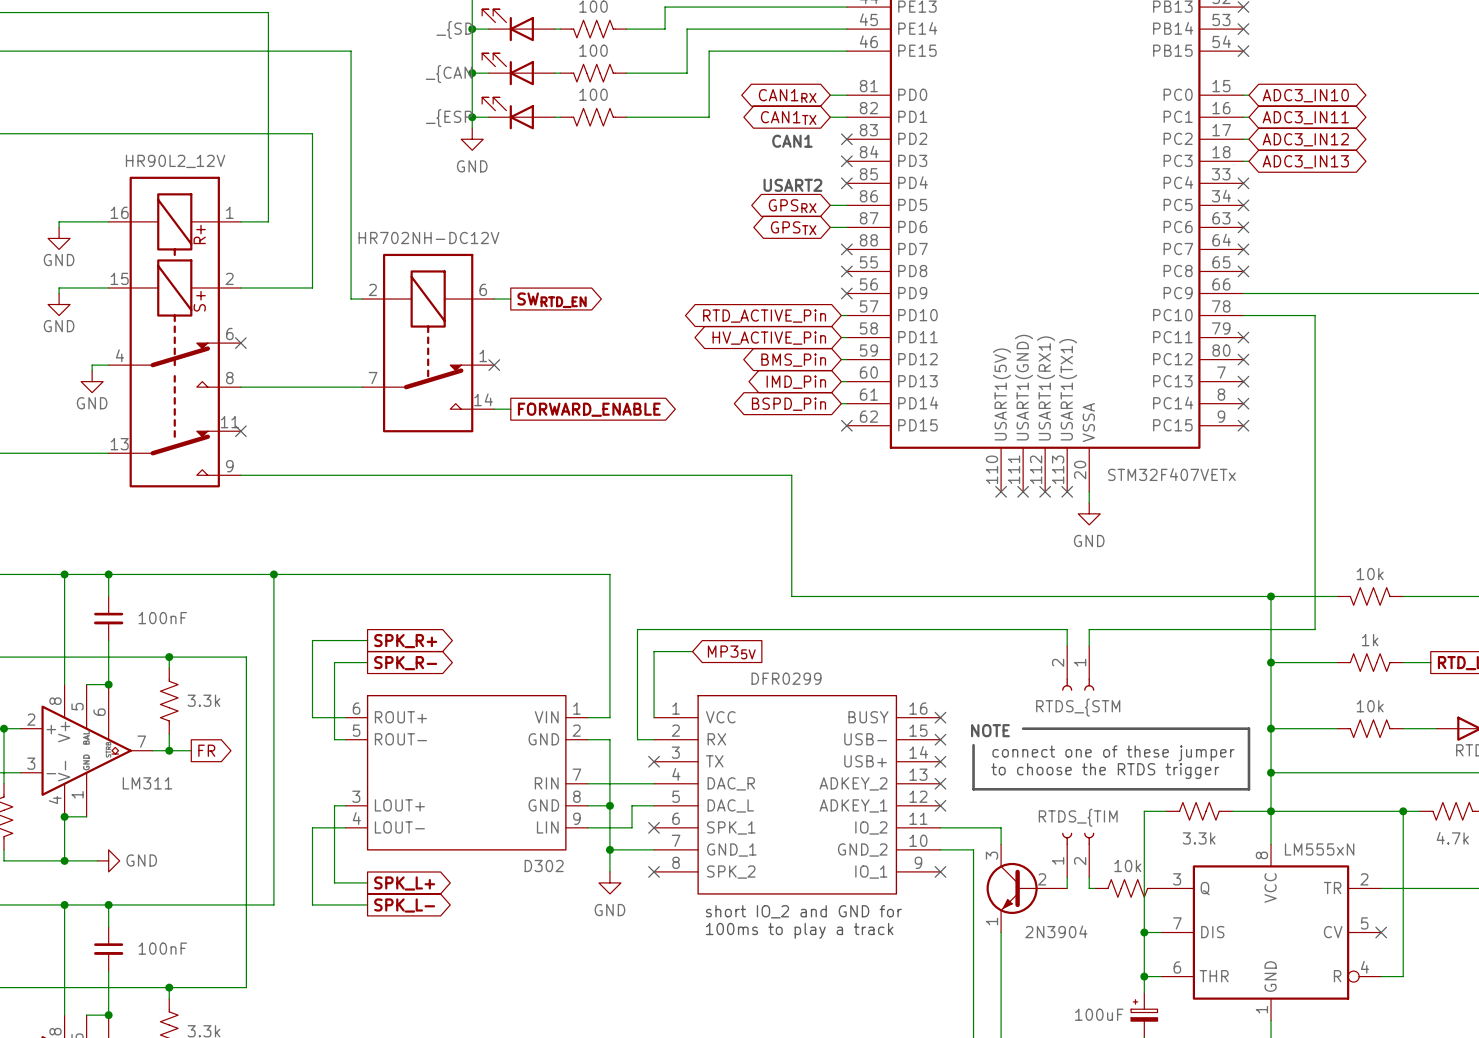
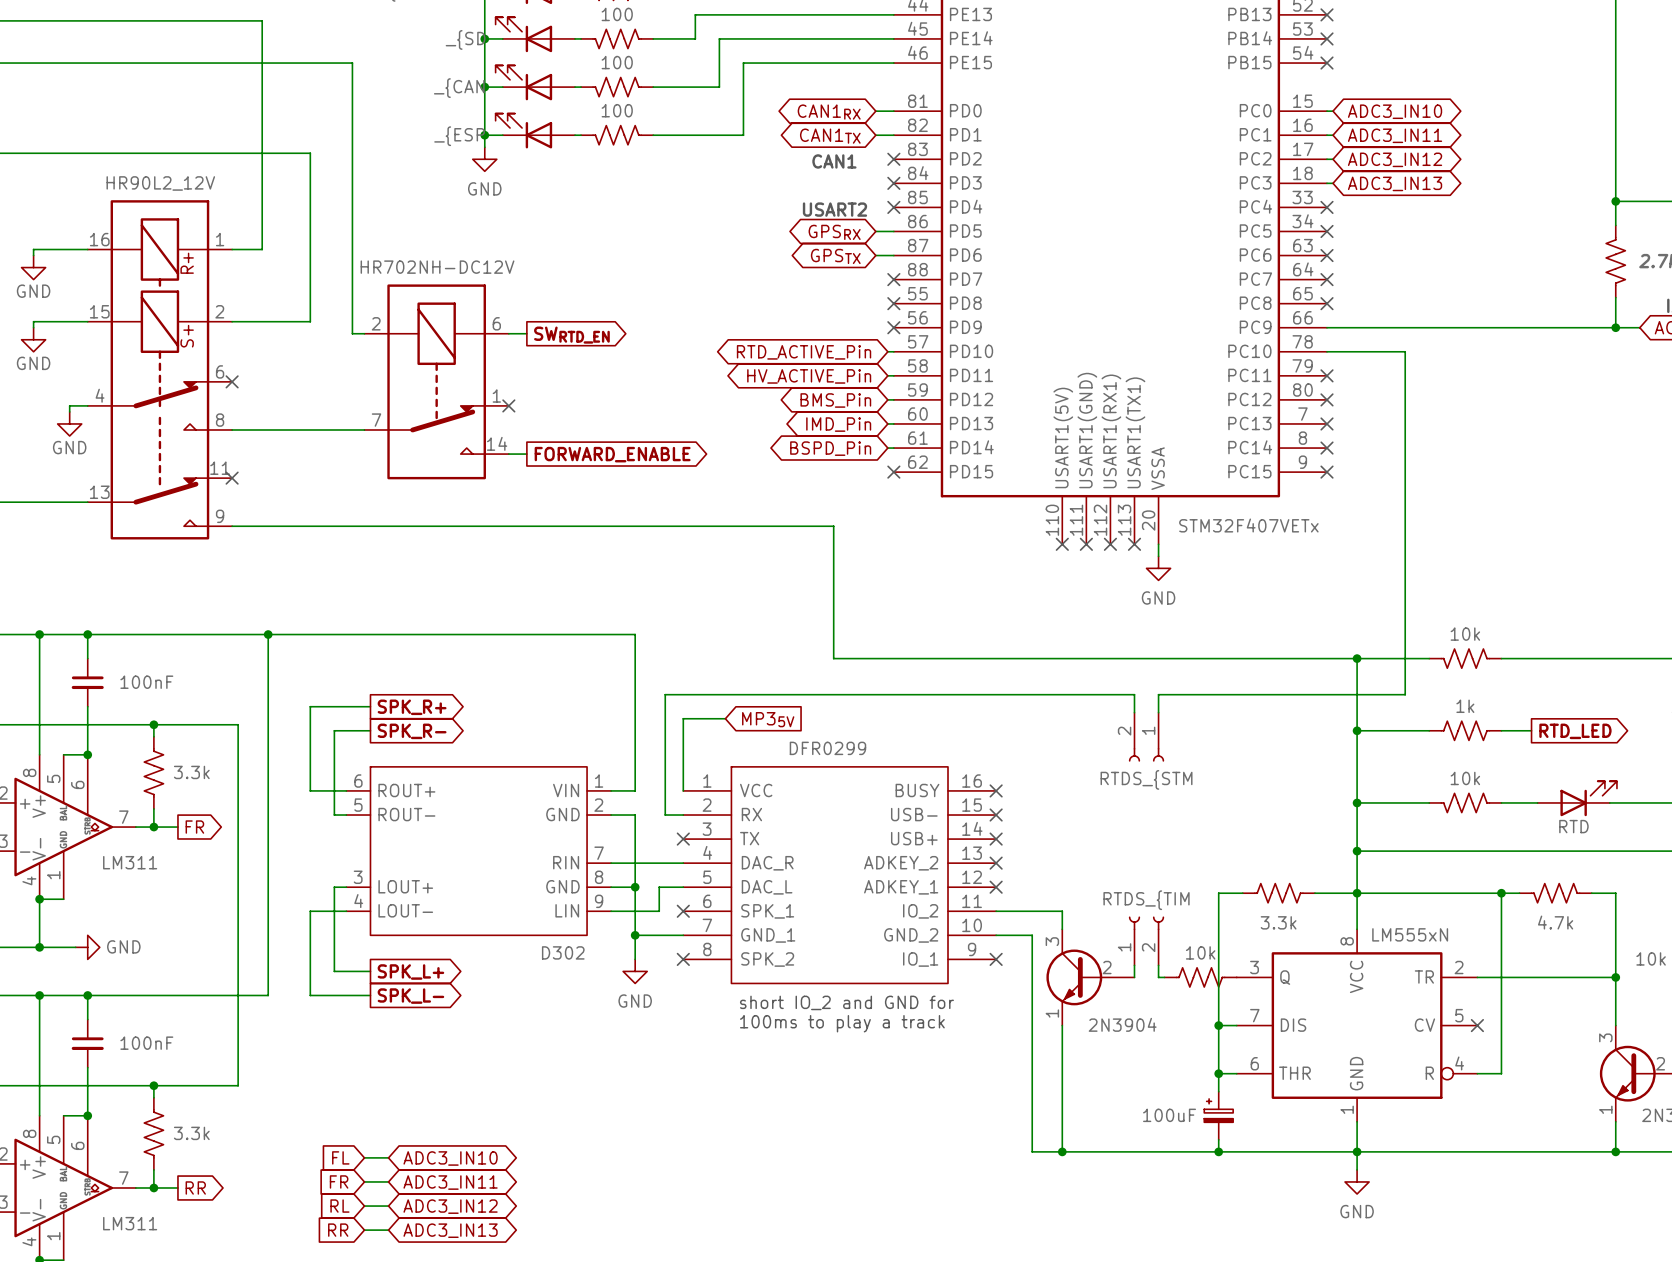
line: (1023, 728) (1248, 728) (1248, 789) (973, 789) (973, 745) -> none
text: NOTE (990, 730) -> none
text: connect one of these jumper (1113, 753) -> none
text: to choose the RTDS trigger (1105, 771) -> none

